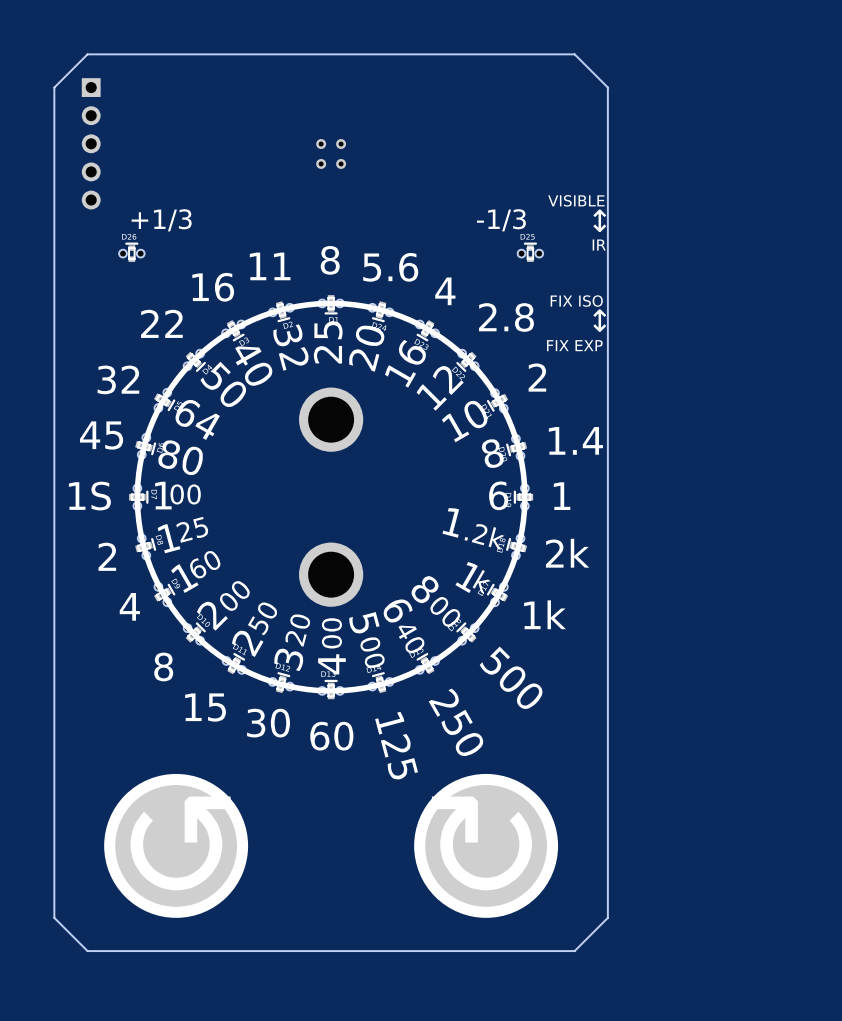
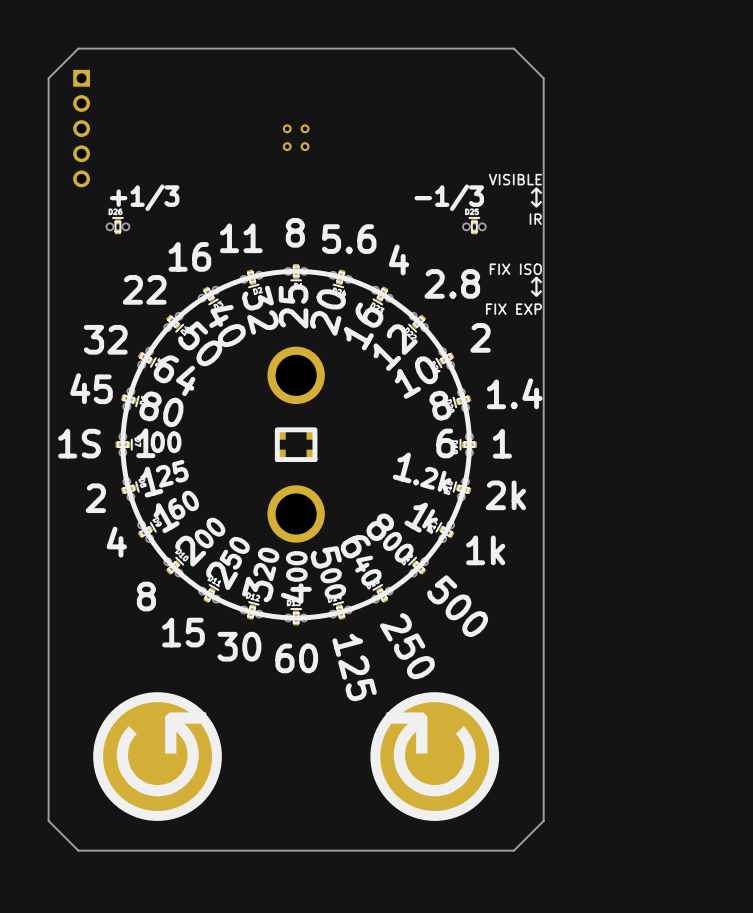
part: none -> (296, 444)

